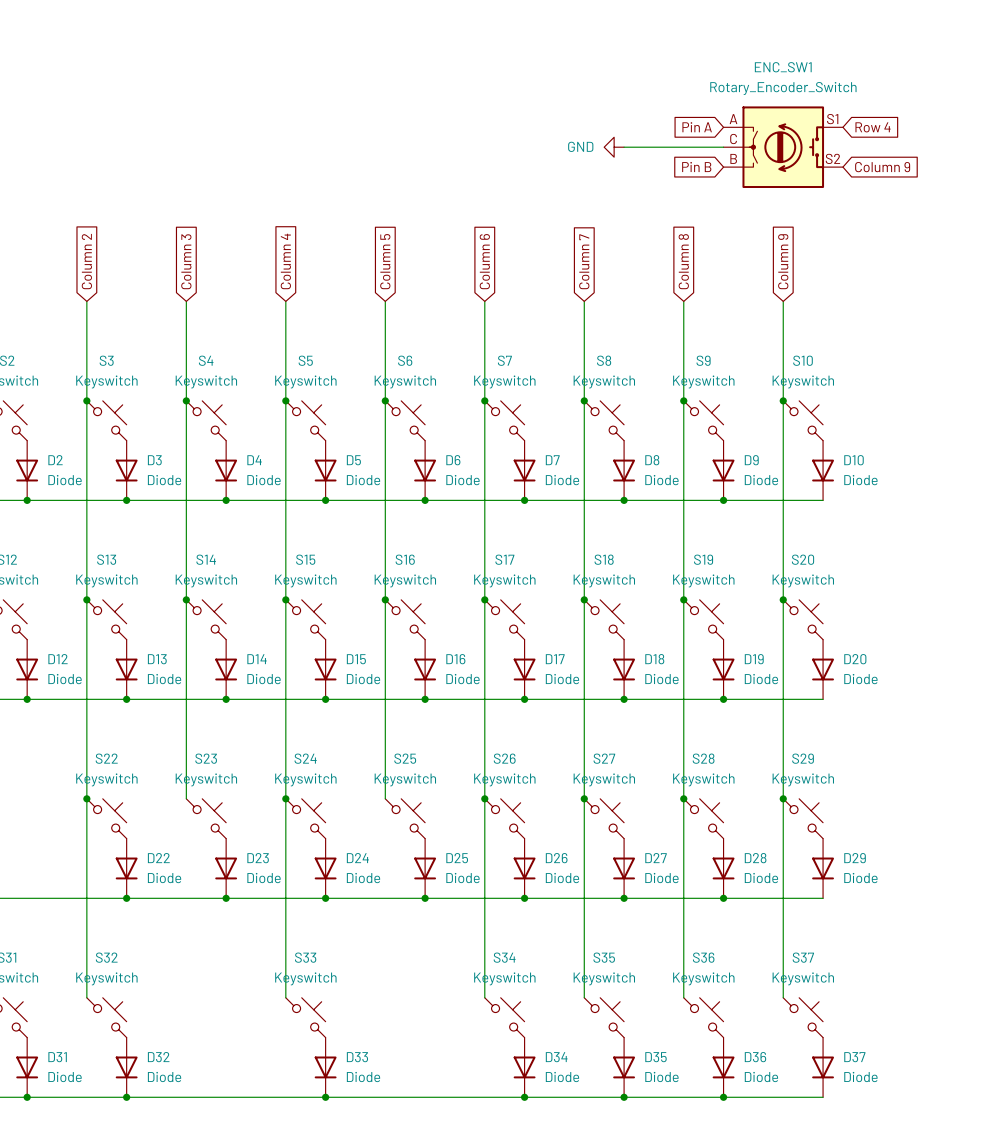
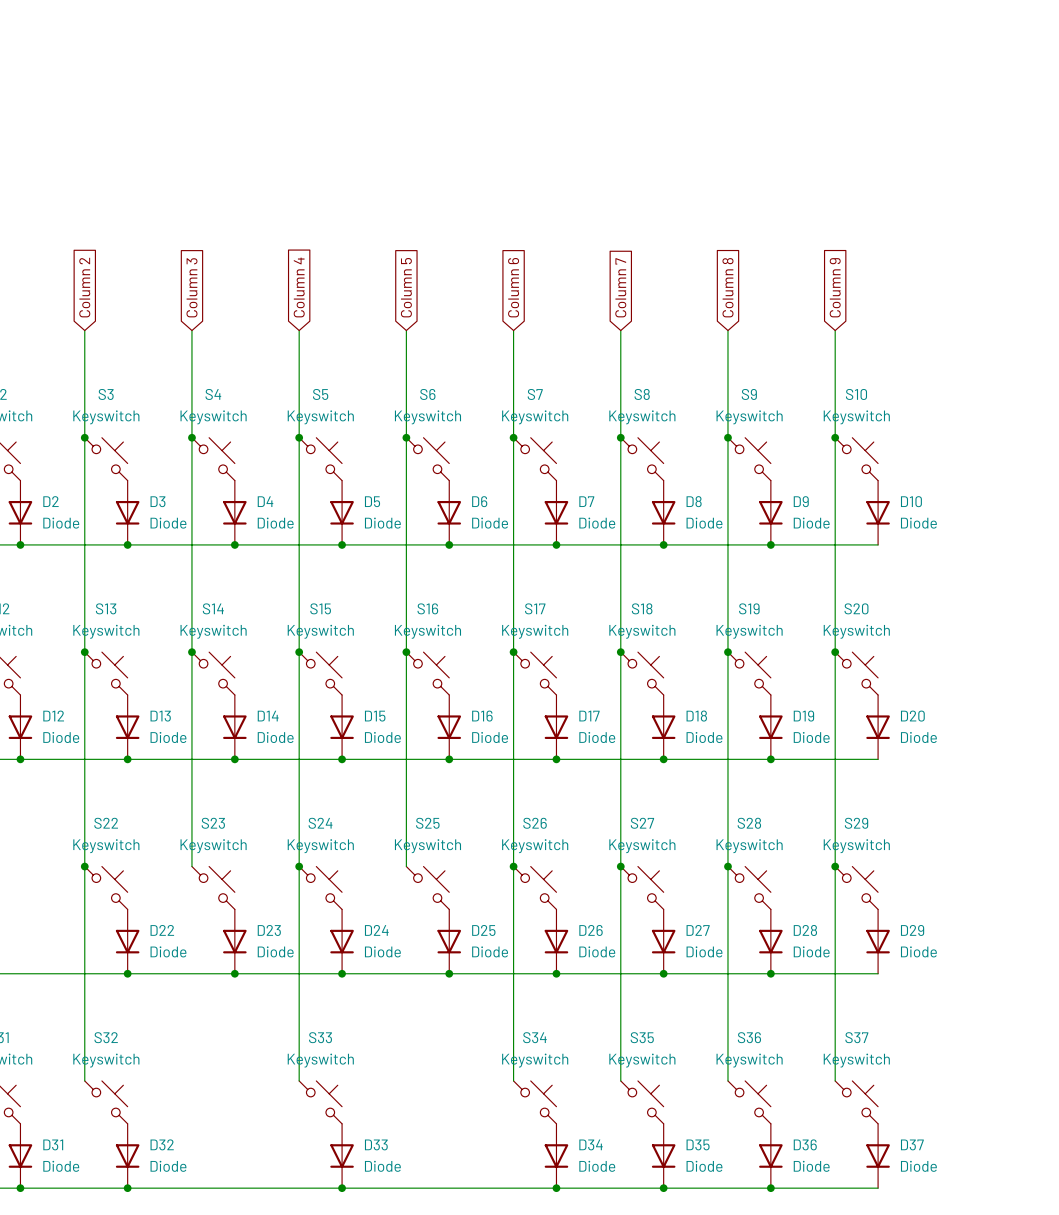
global label: Pin A (697, 127) -> none
global label: Row 4 (873, 127) -> none
power symbol: GND (614, 147) -> none
wire: (624, 147) (723, 147) -> none
ENC_SW1: Rotary_Encoder_Switch (783, 147) -> none
global label: Pin B (696, 167) -> none
global label: Column 9 (882, 167) -> none

